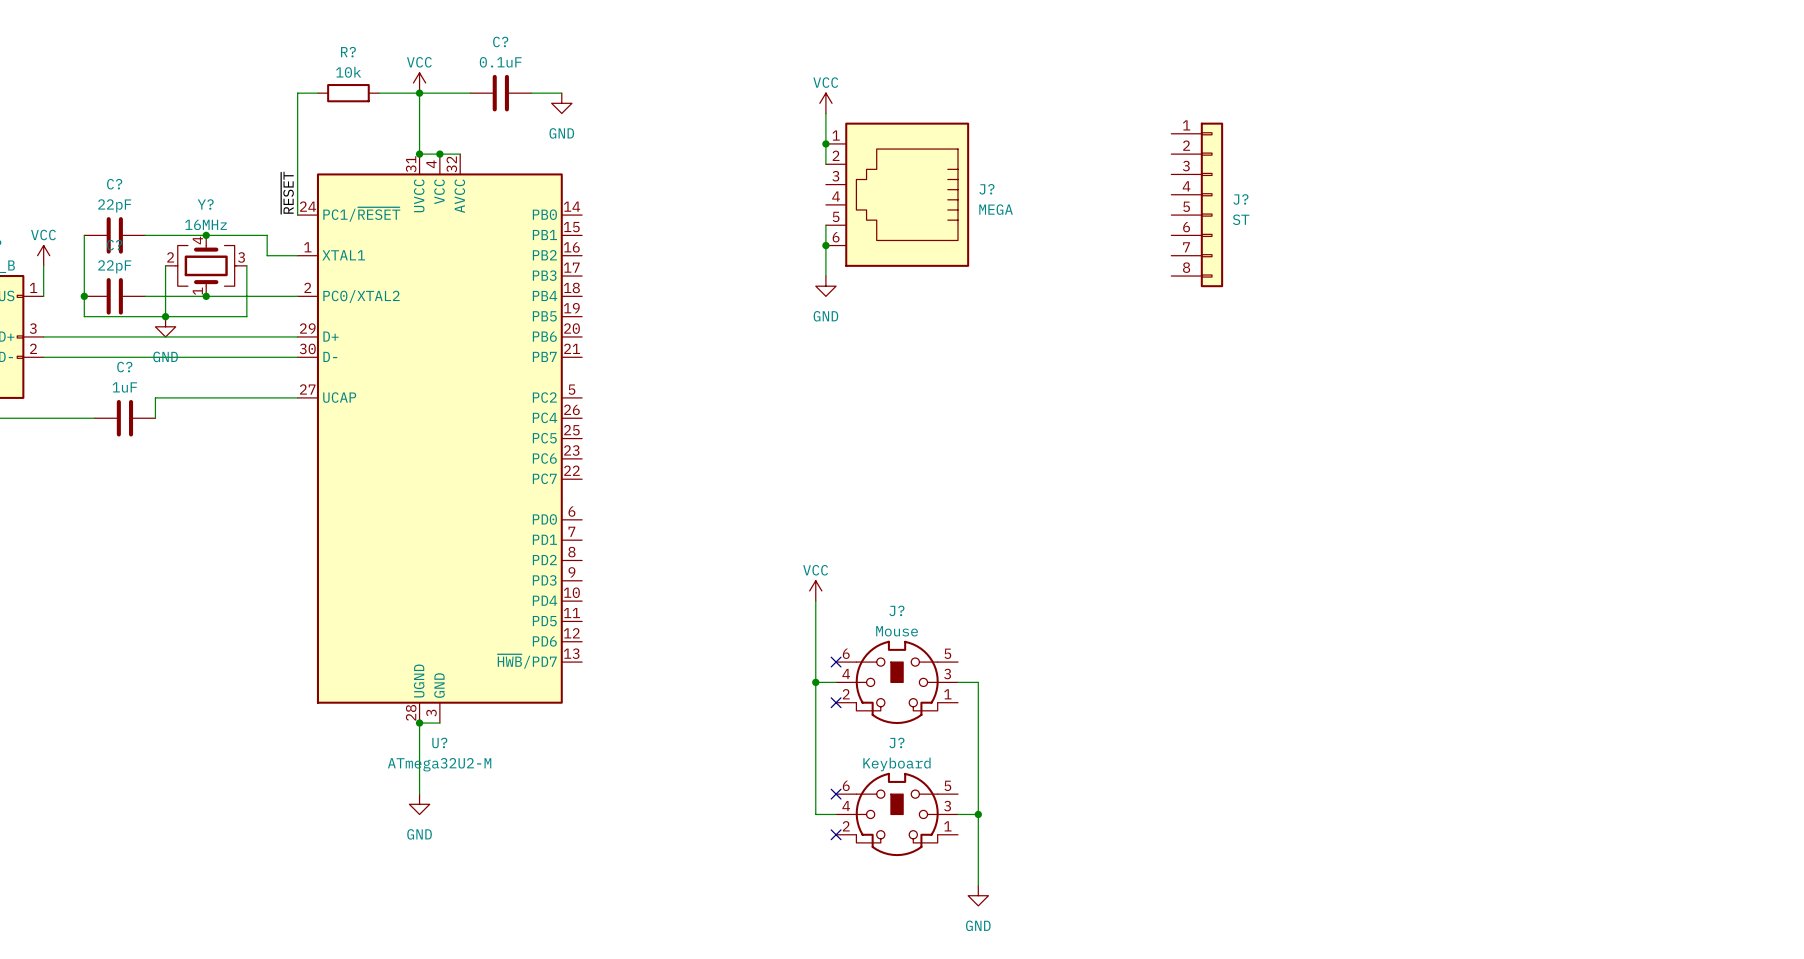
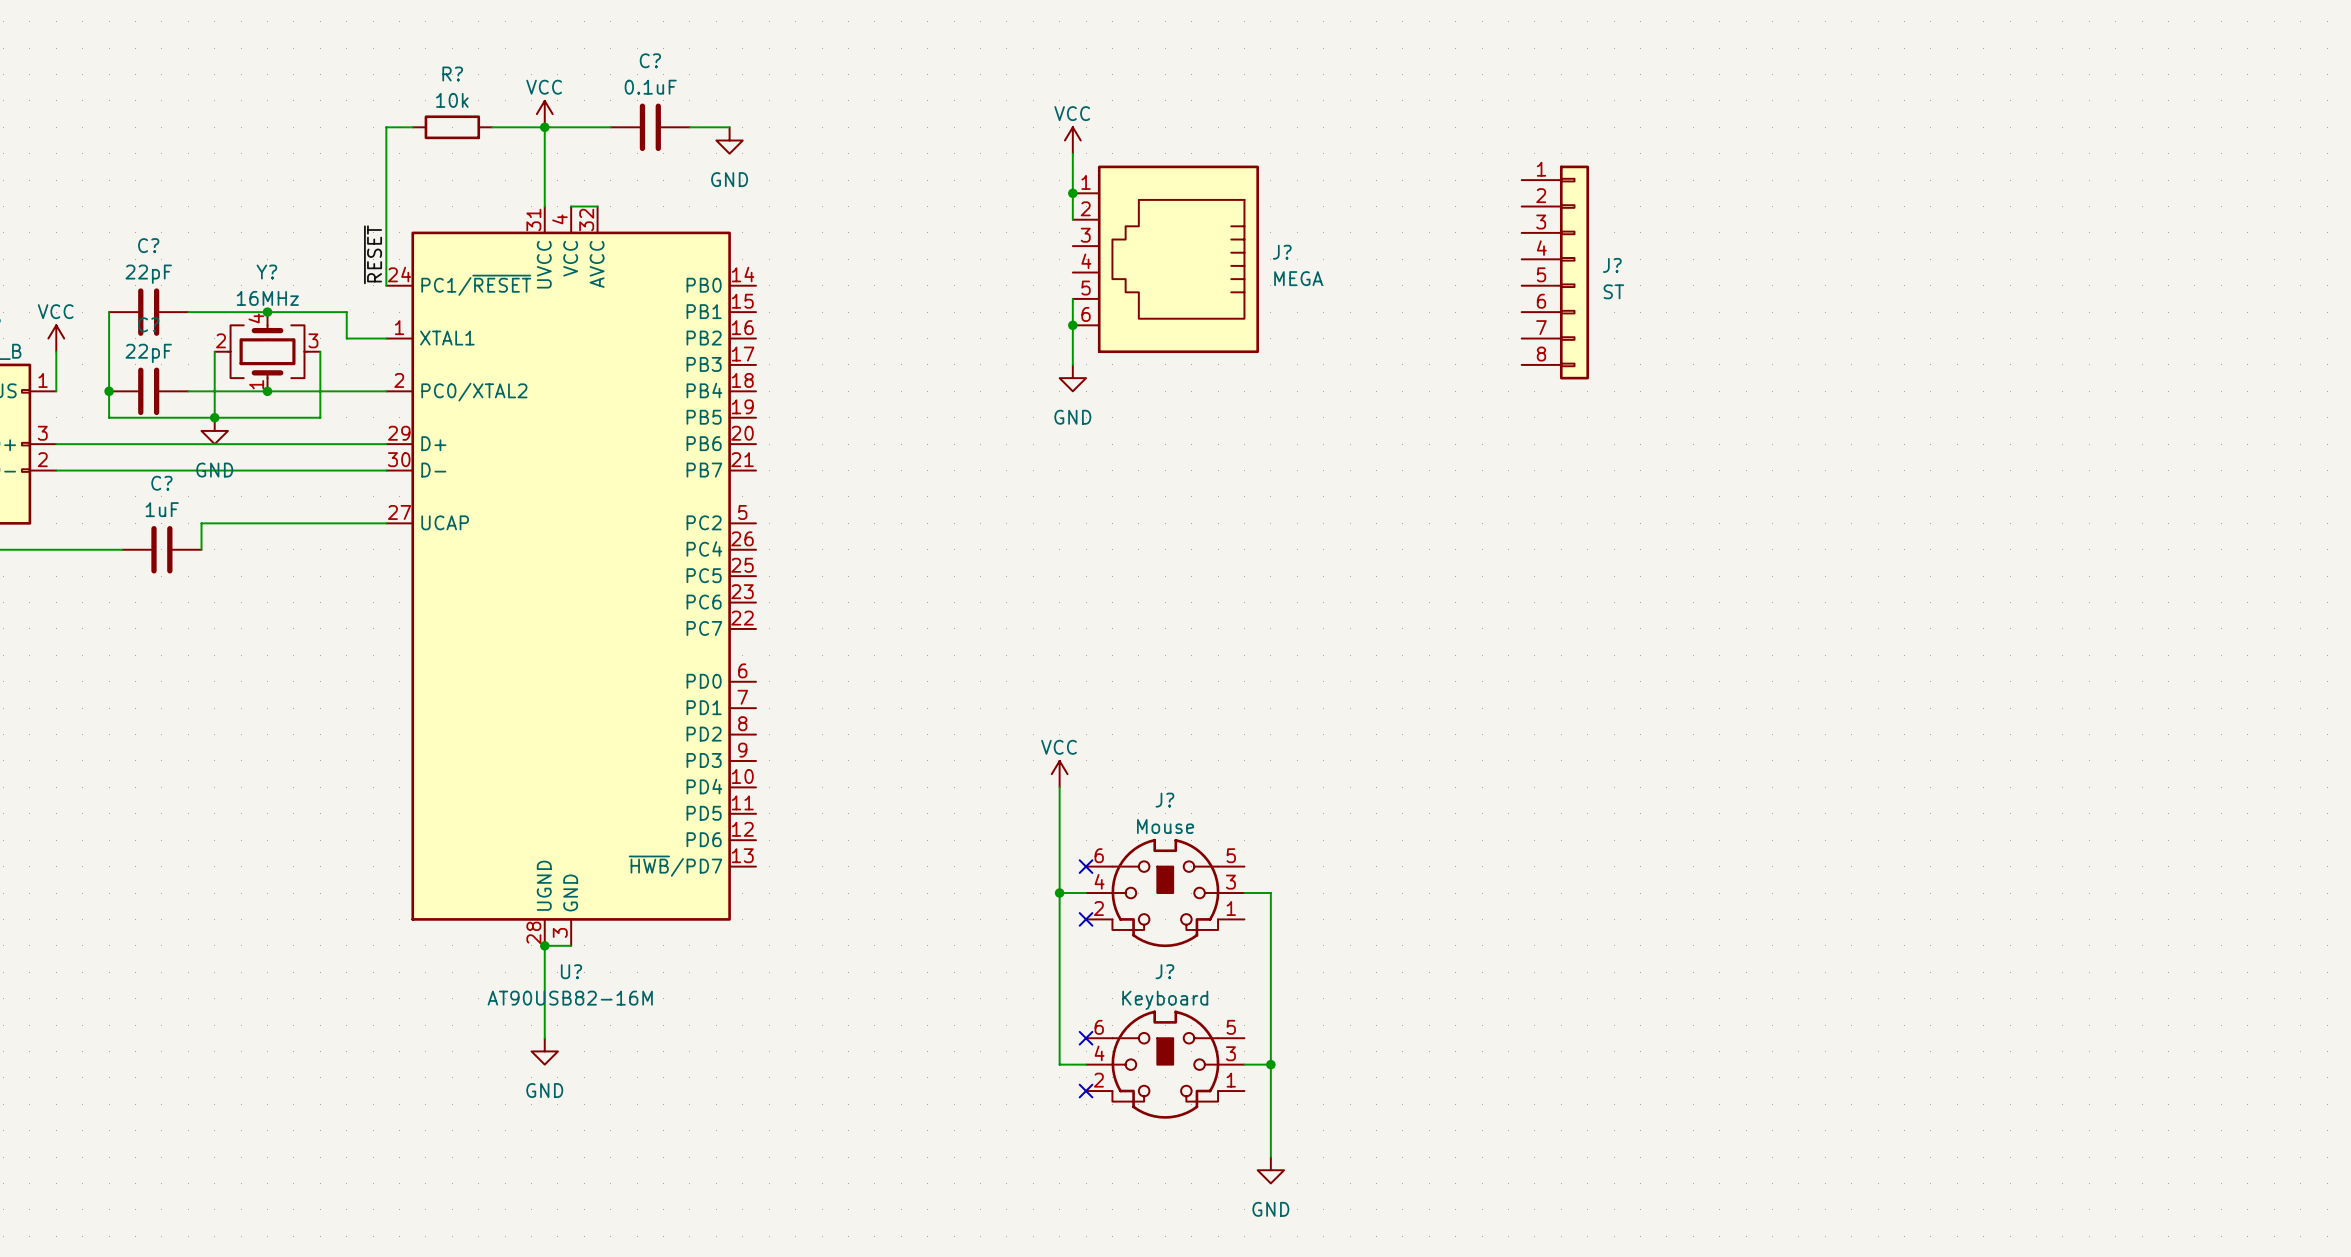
wire: (419, 154) (439, 154) -> none
junction: (419, 154) -> none
junction: (439, 154) -> none
U? value: ATmega32U2-M (439, 764) -> AT90USB82-16M (570, 998)

